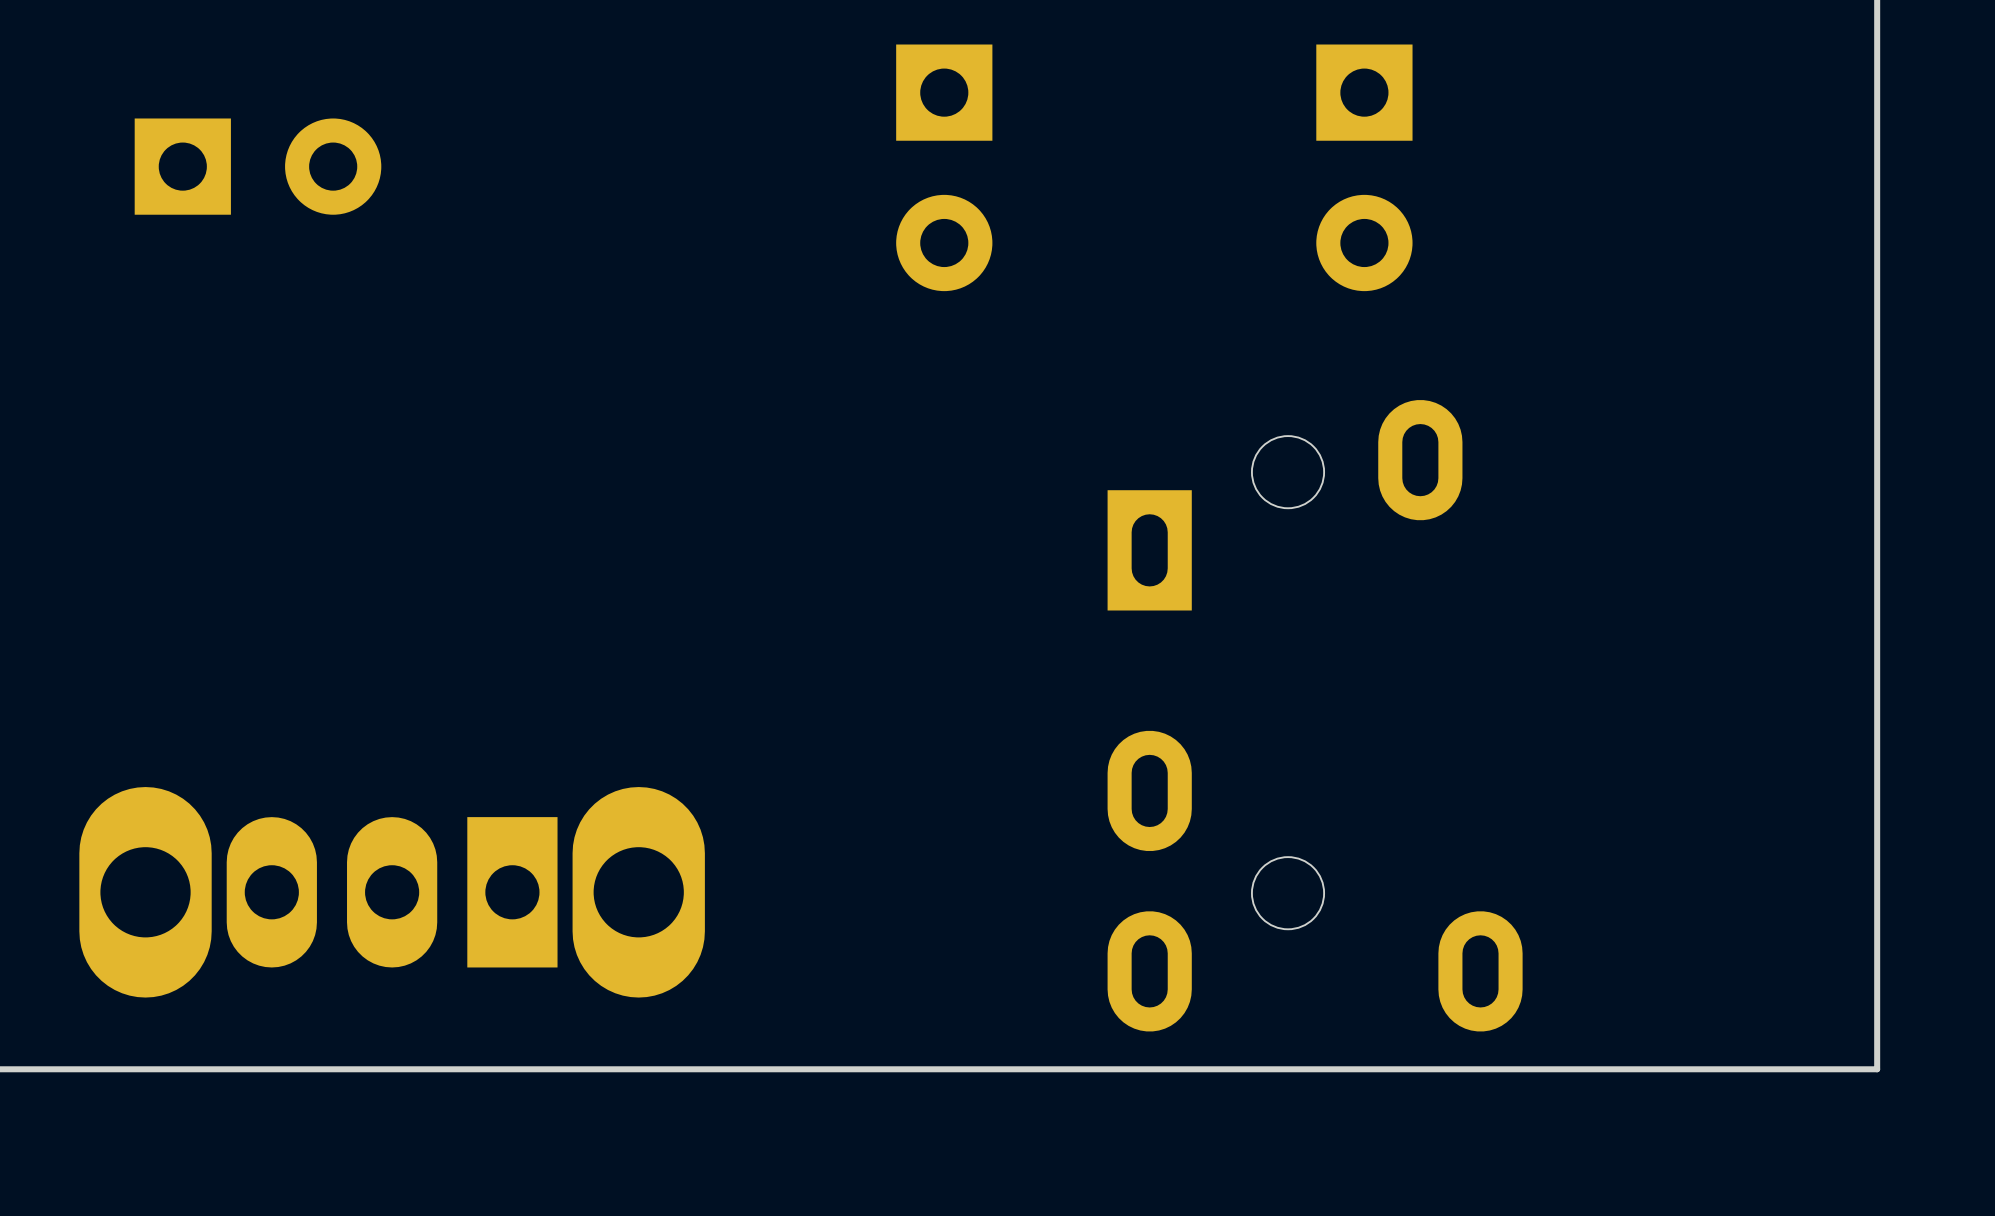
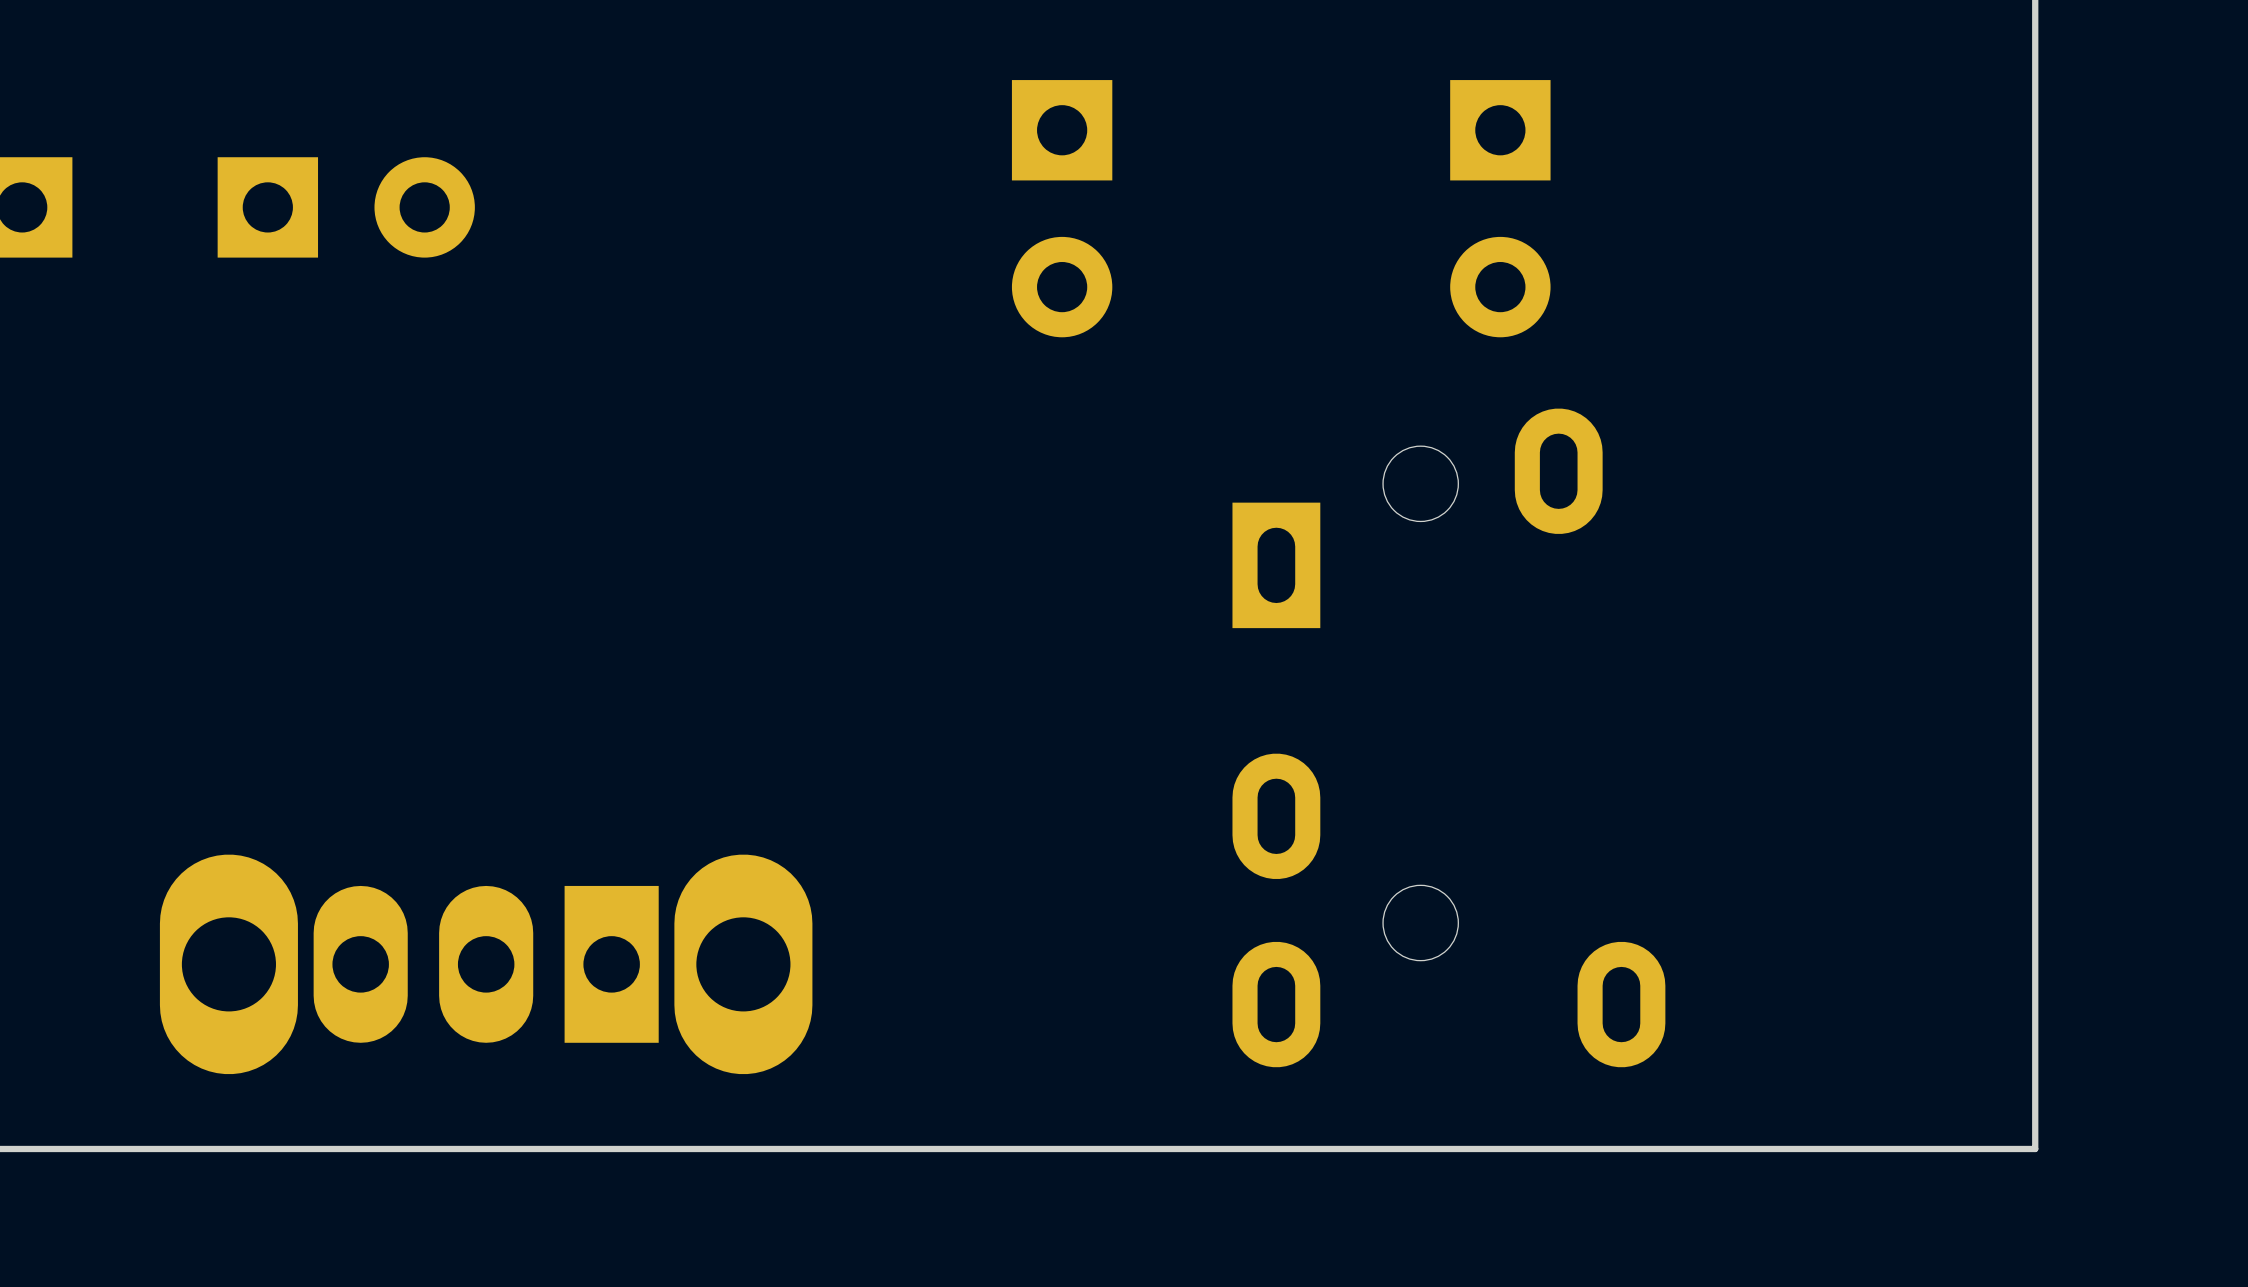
part position: (1315, 715) -> (1448, 737)

